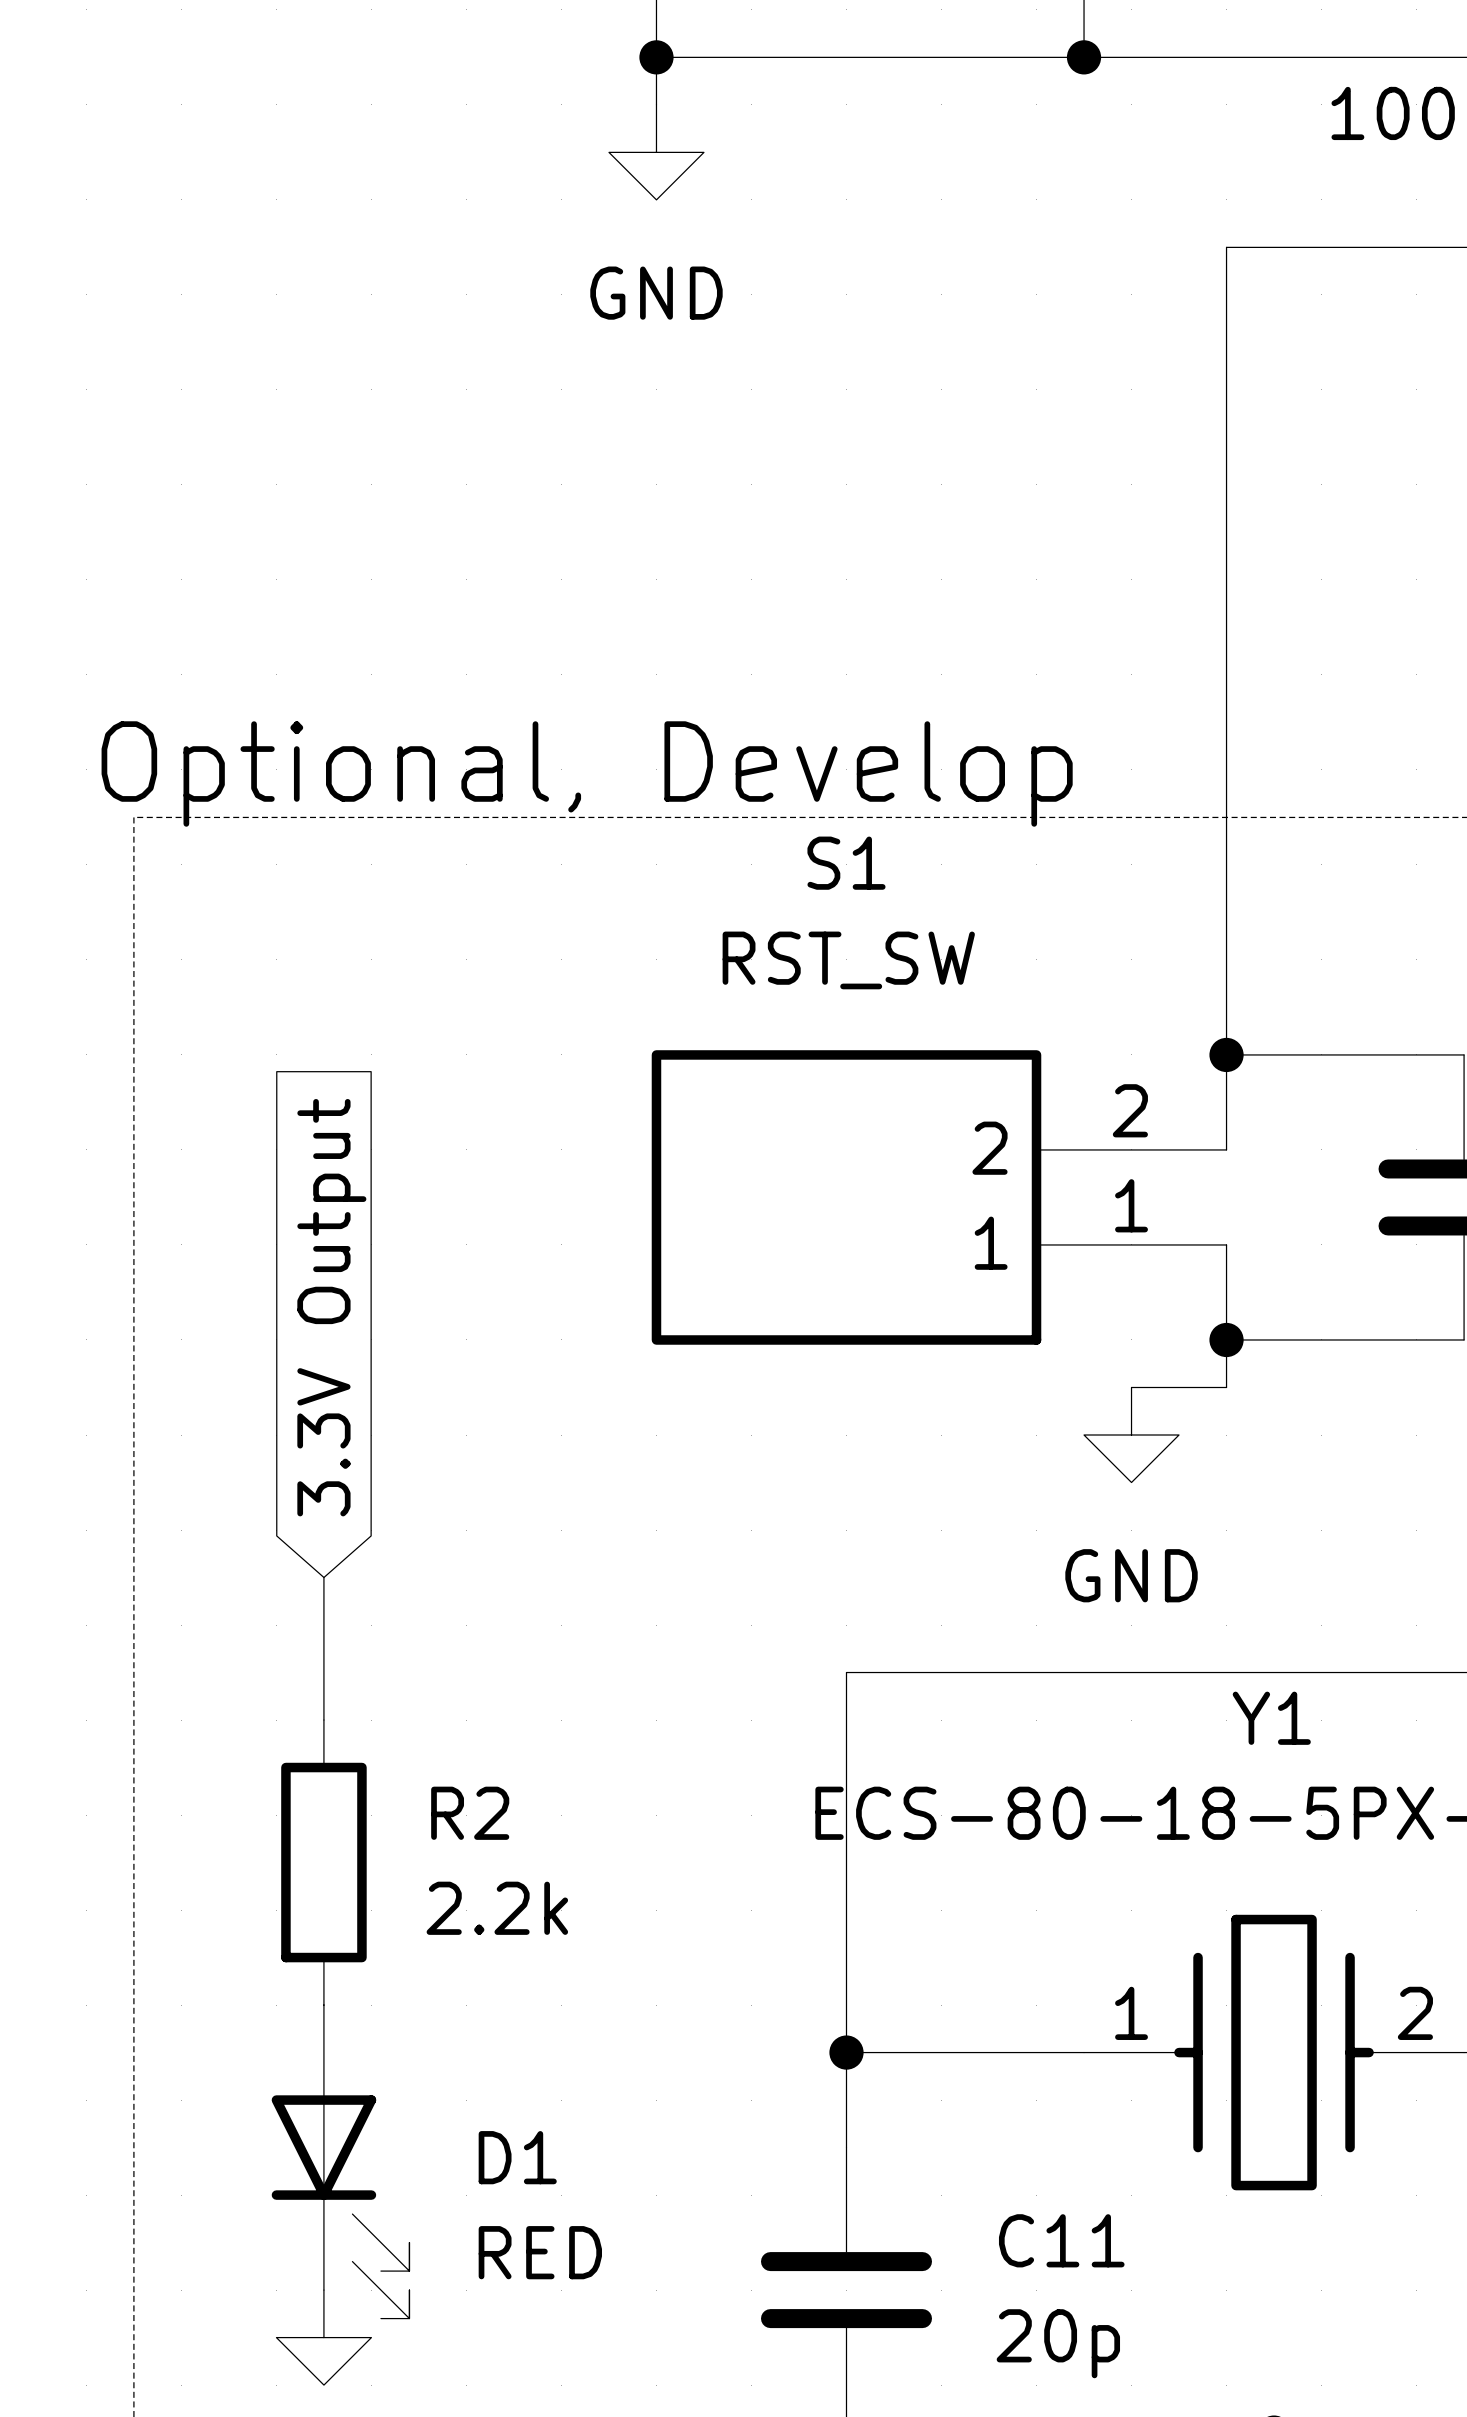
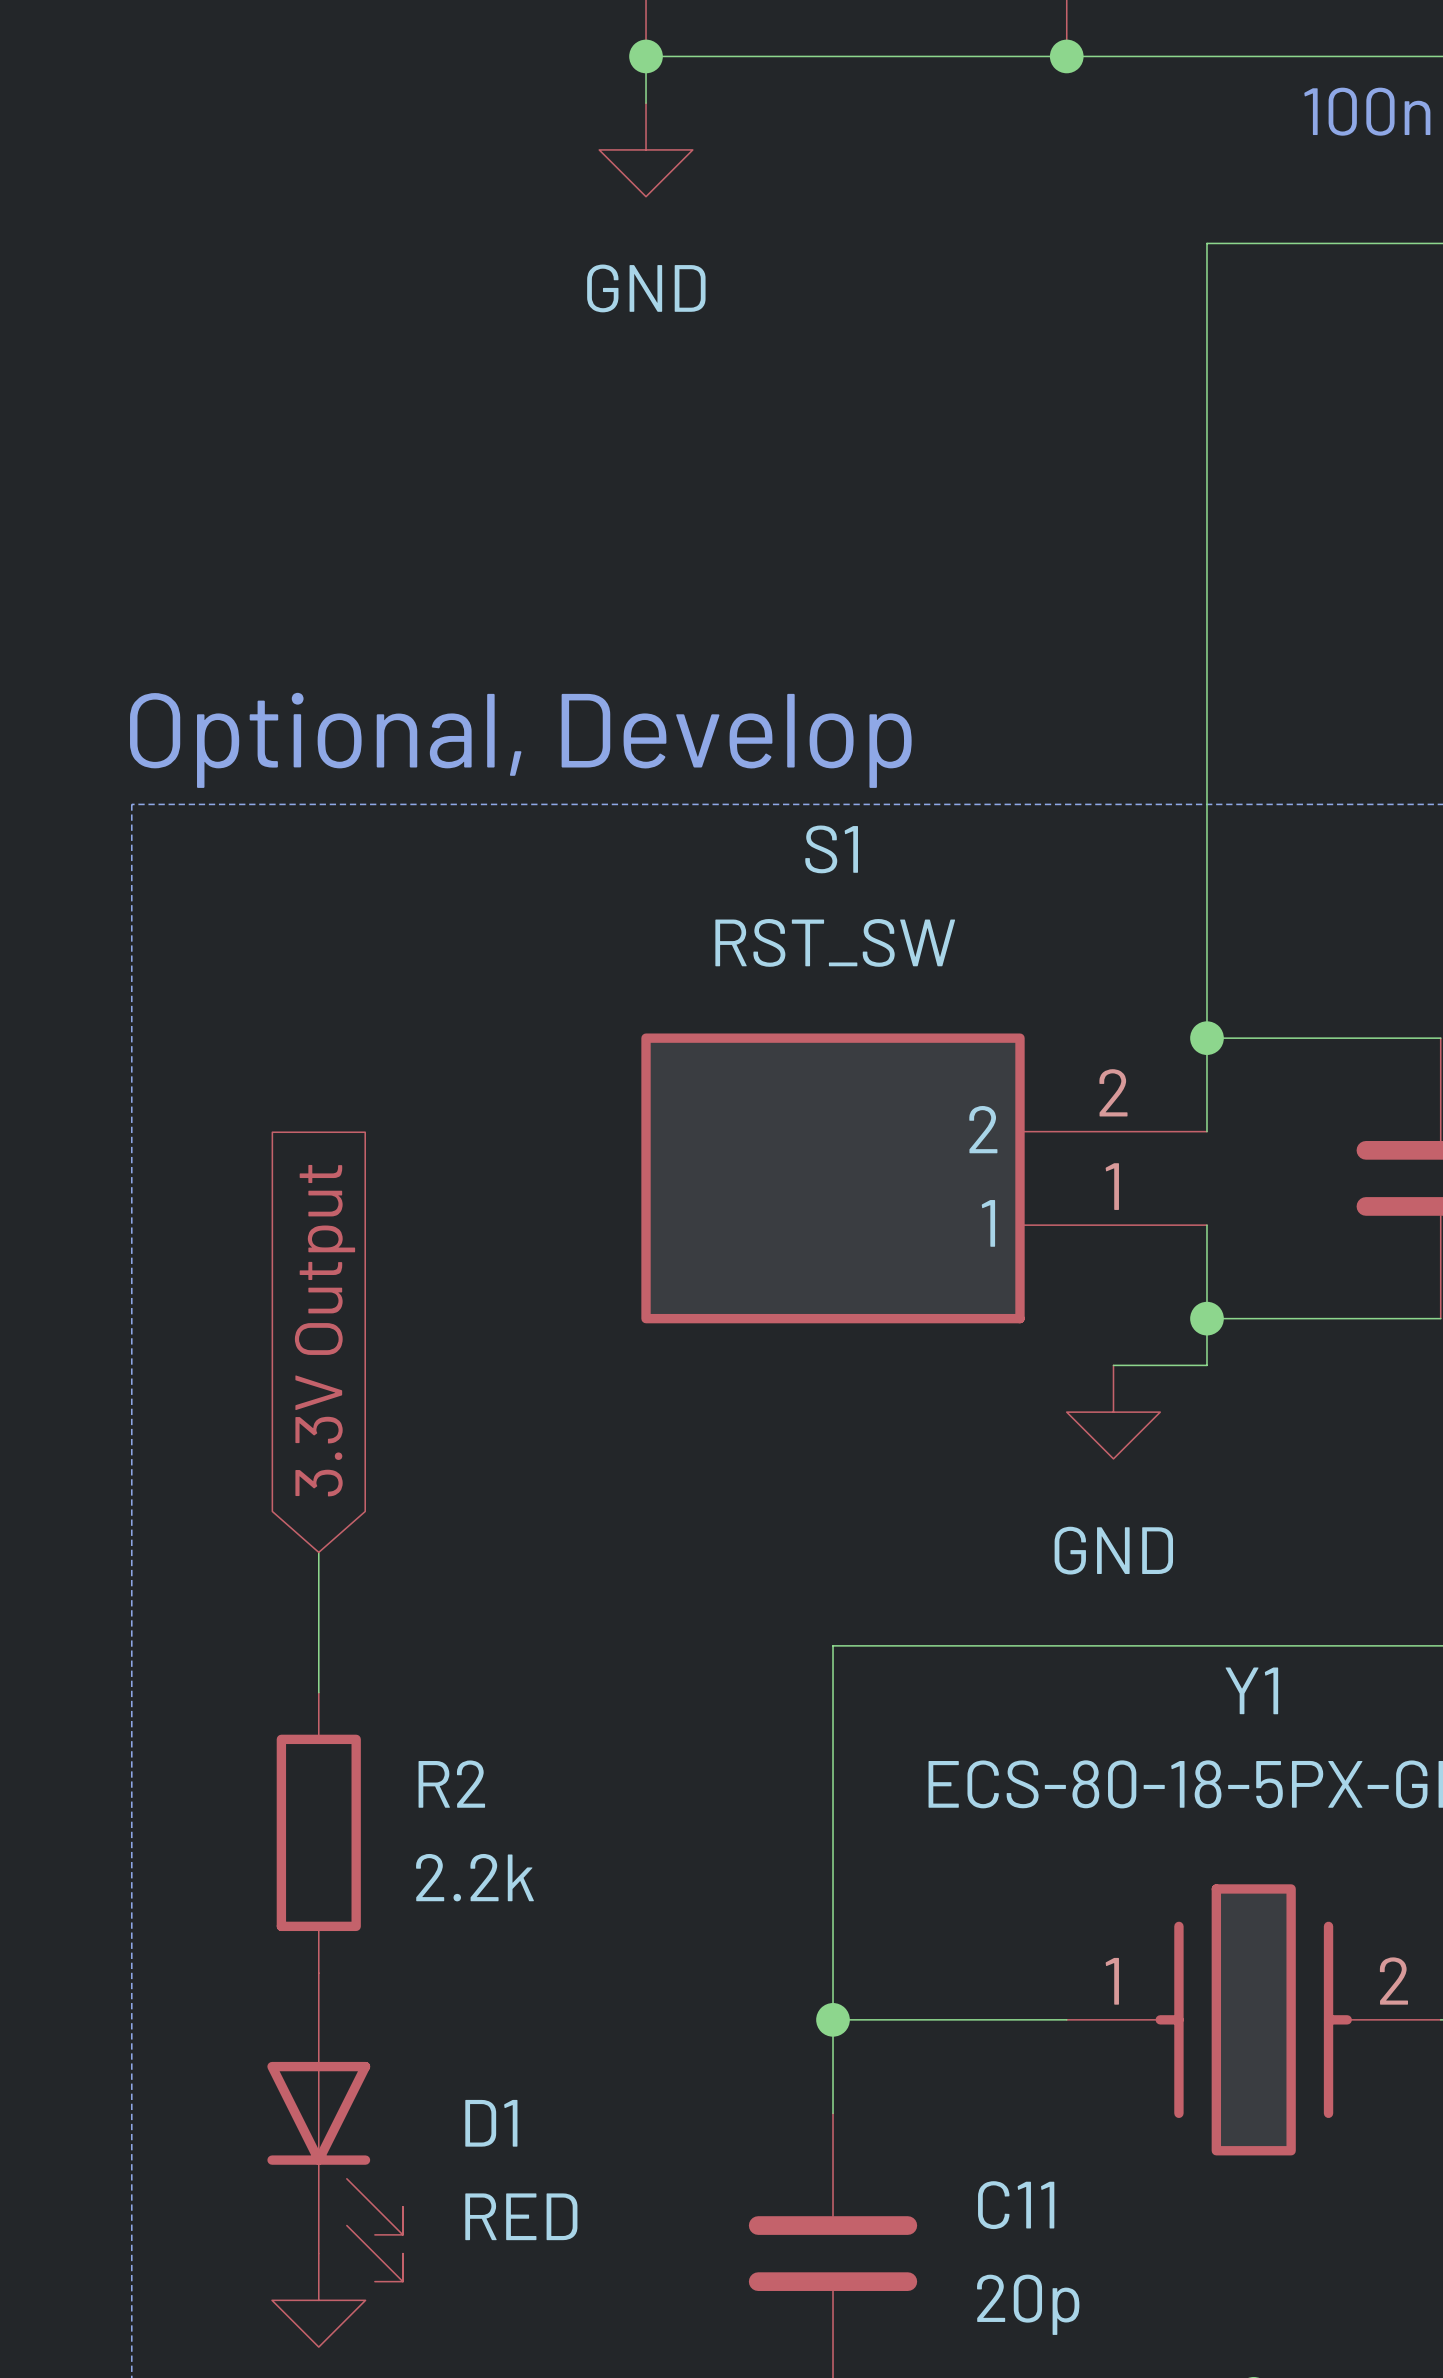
text position: Optional, Develop (587, 773) -> Optional, Develop (520, 740)

